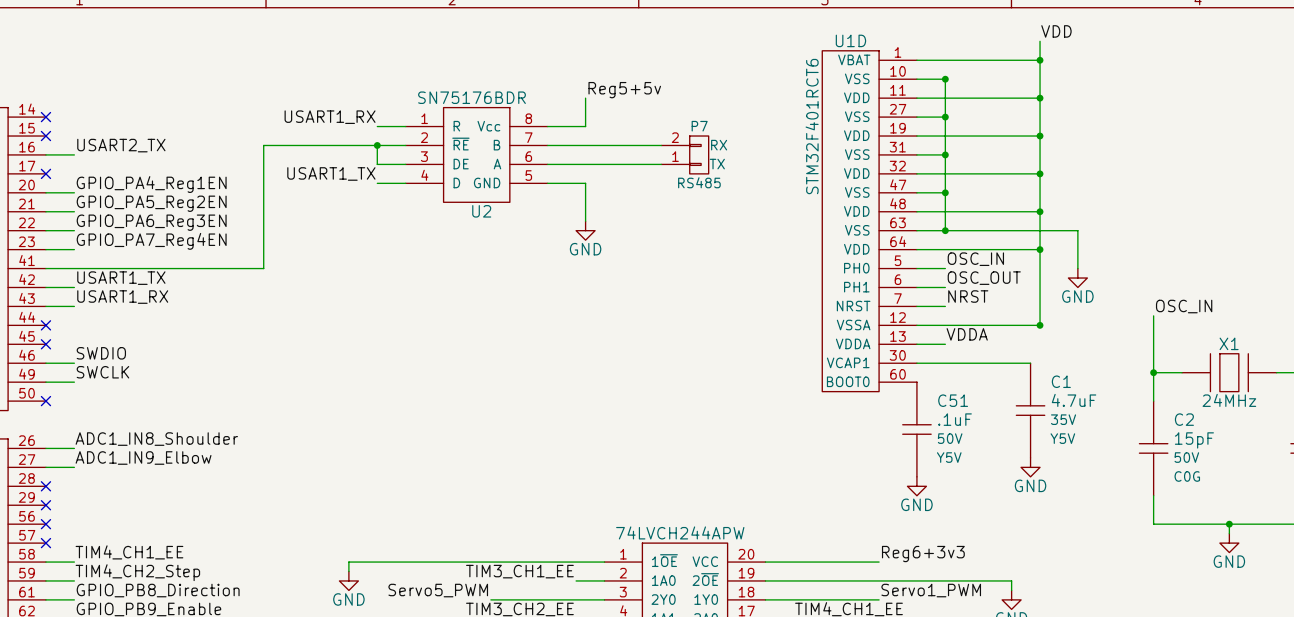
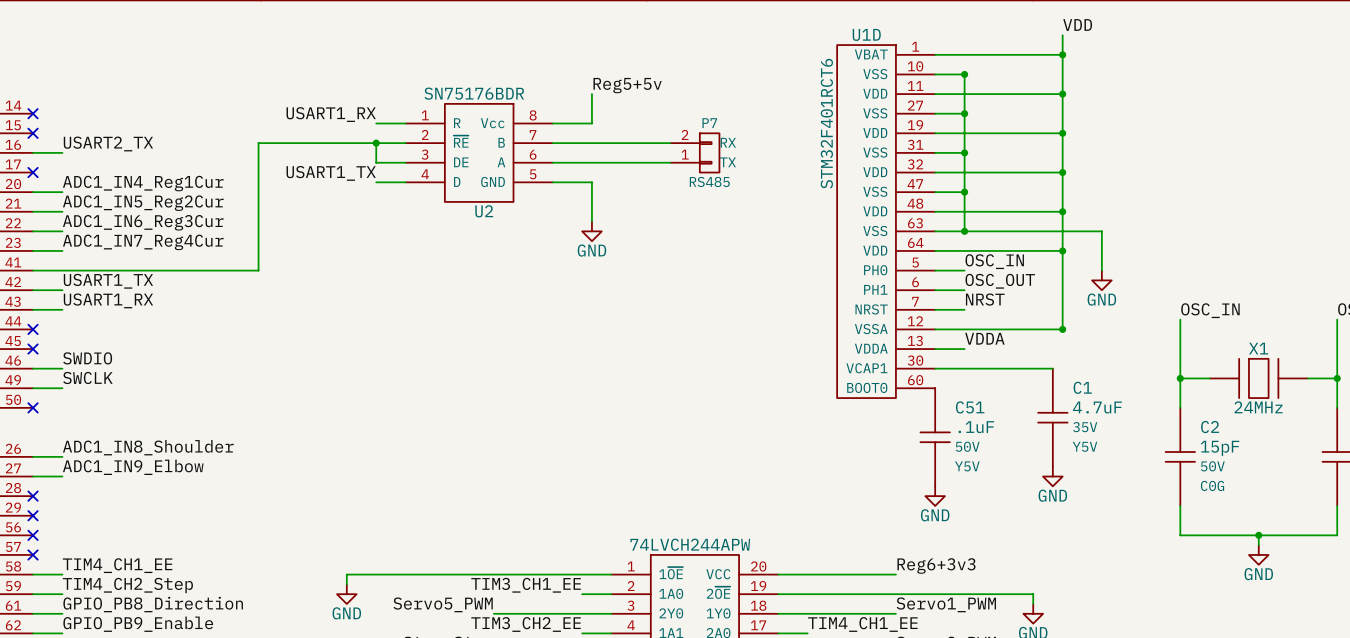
label: GPIO_PA4_Reg1EN (151, 184) -> ADC1_IN4_Reg1Cur (143, 183)
label: GPIO_PA5_Reg2EN (151, 203) -> ADC1_IN5_Reg2Cur (143, 203)
label: GPIO_PA6_Reg3EN (151, 222) -> ADC1_IN6_Reg3Cur (143, 222)
label: GPIO_PA7_Reg4EN (151, 241) -> ADC1_IN7_Reg4Cur (143, 242)

